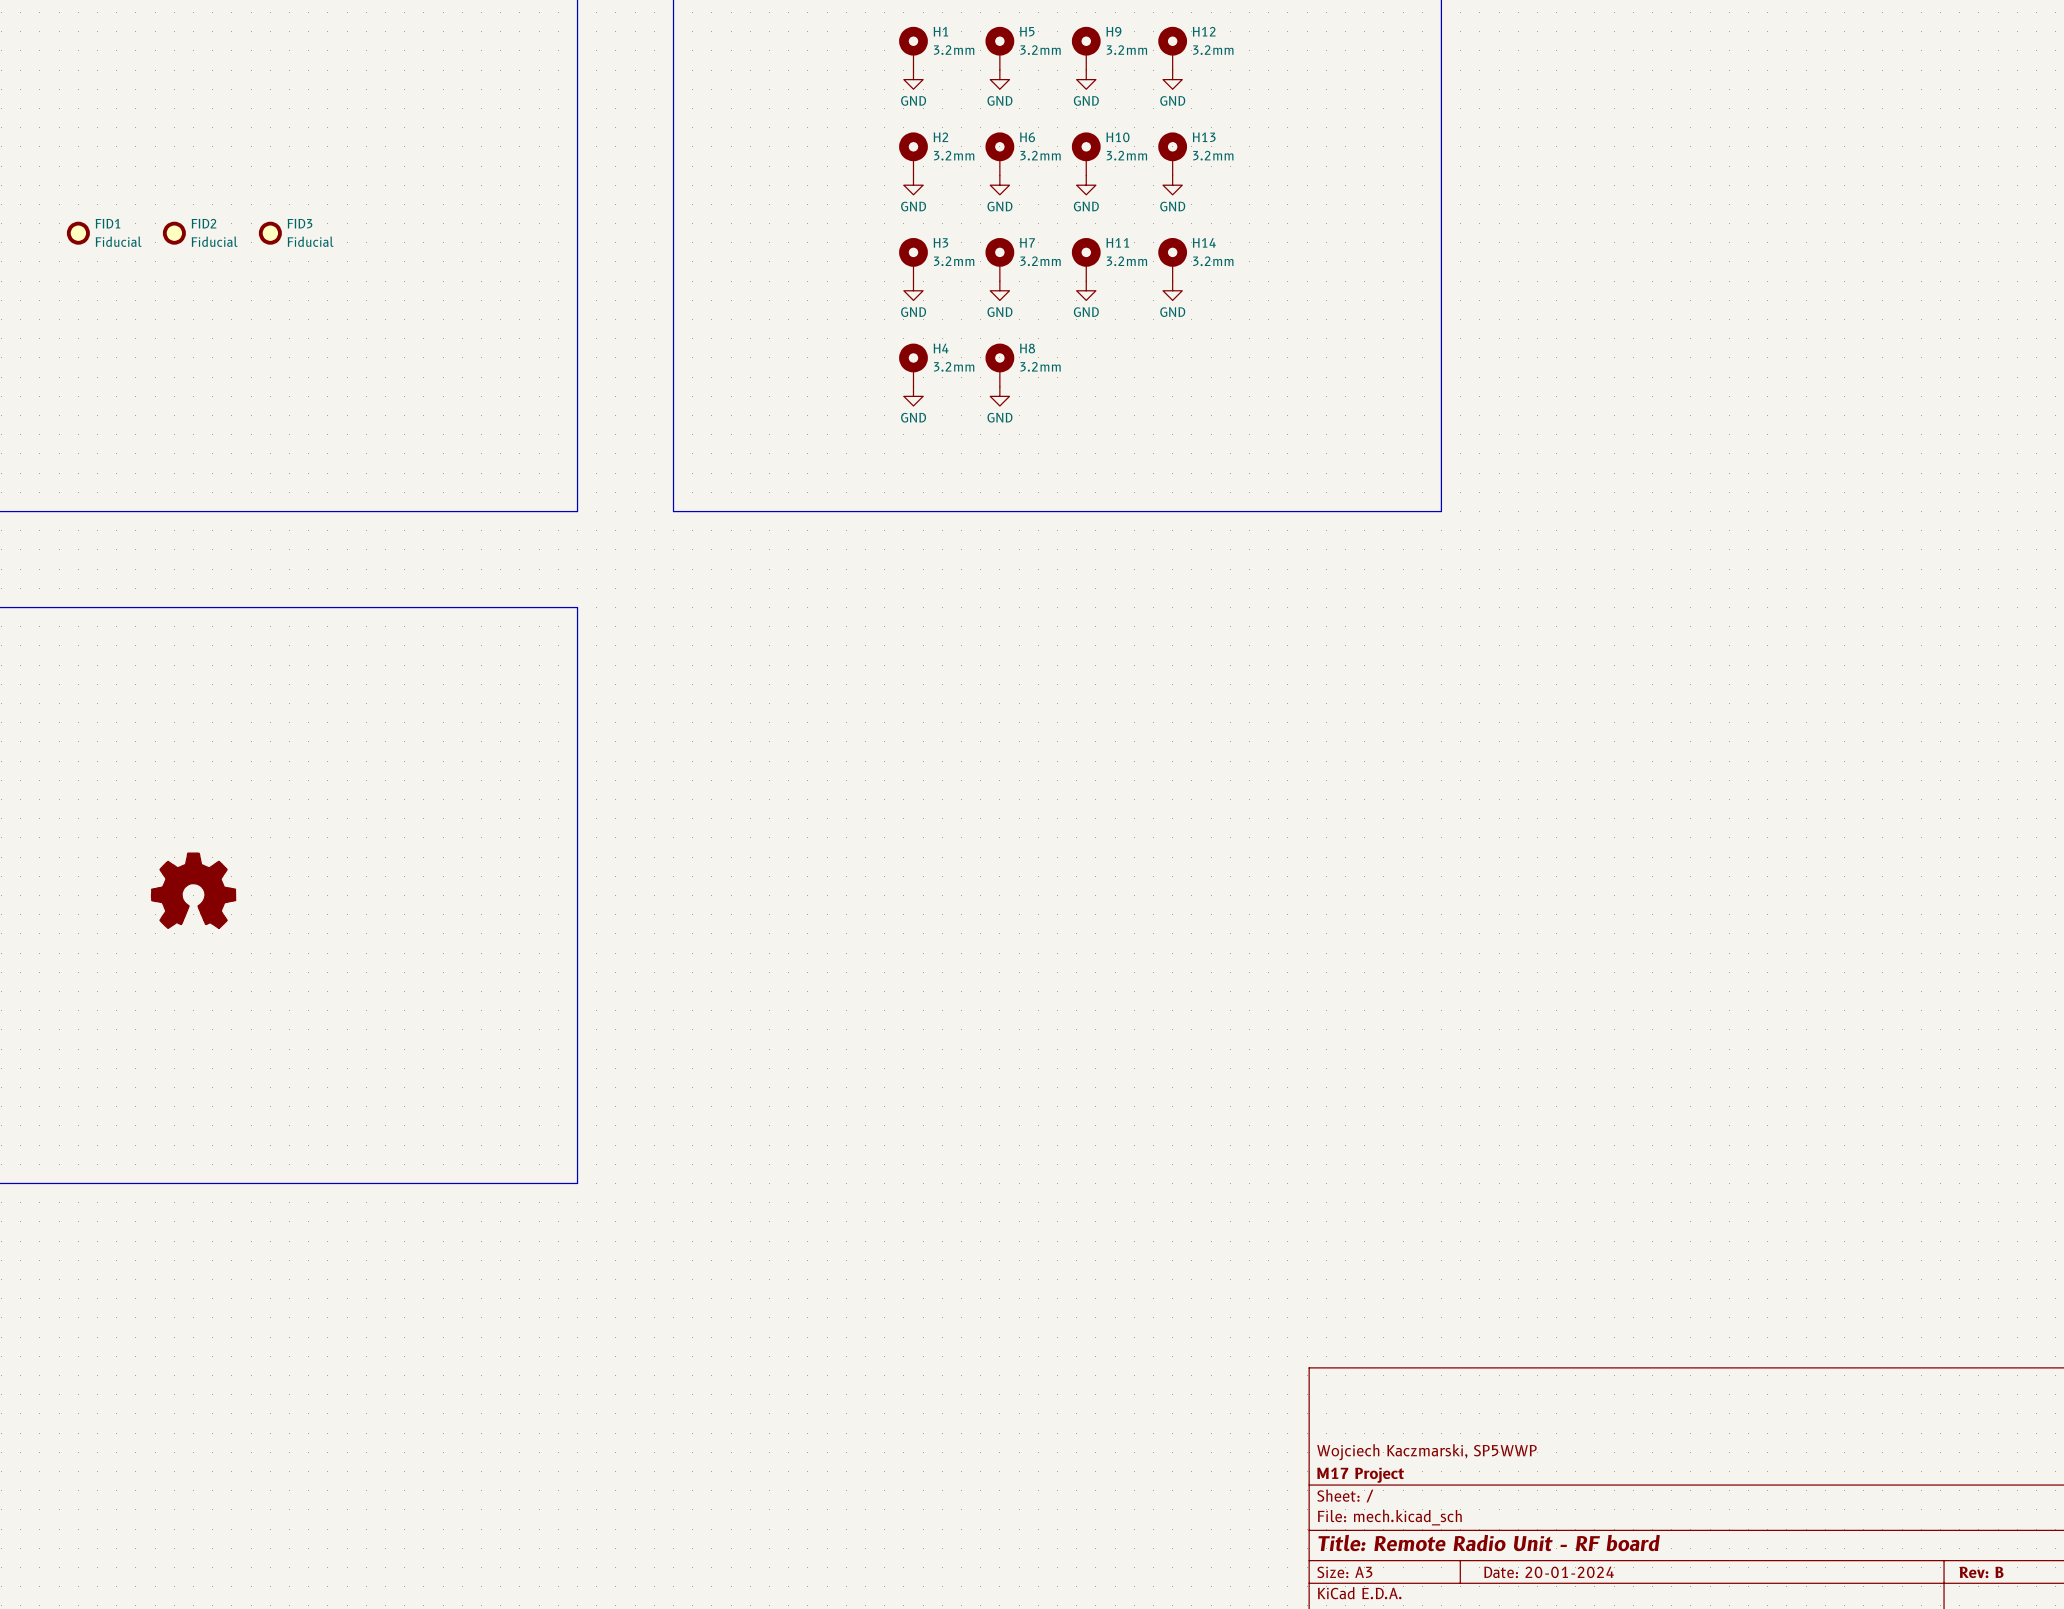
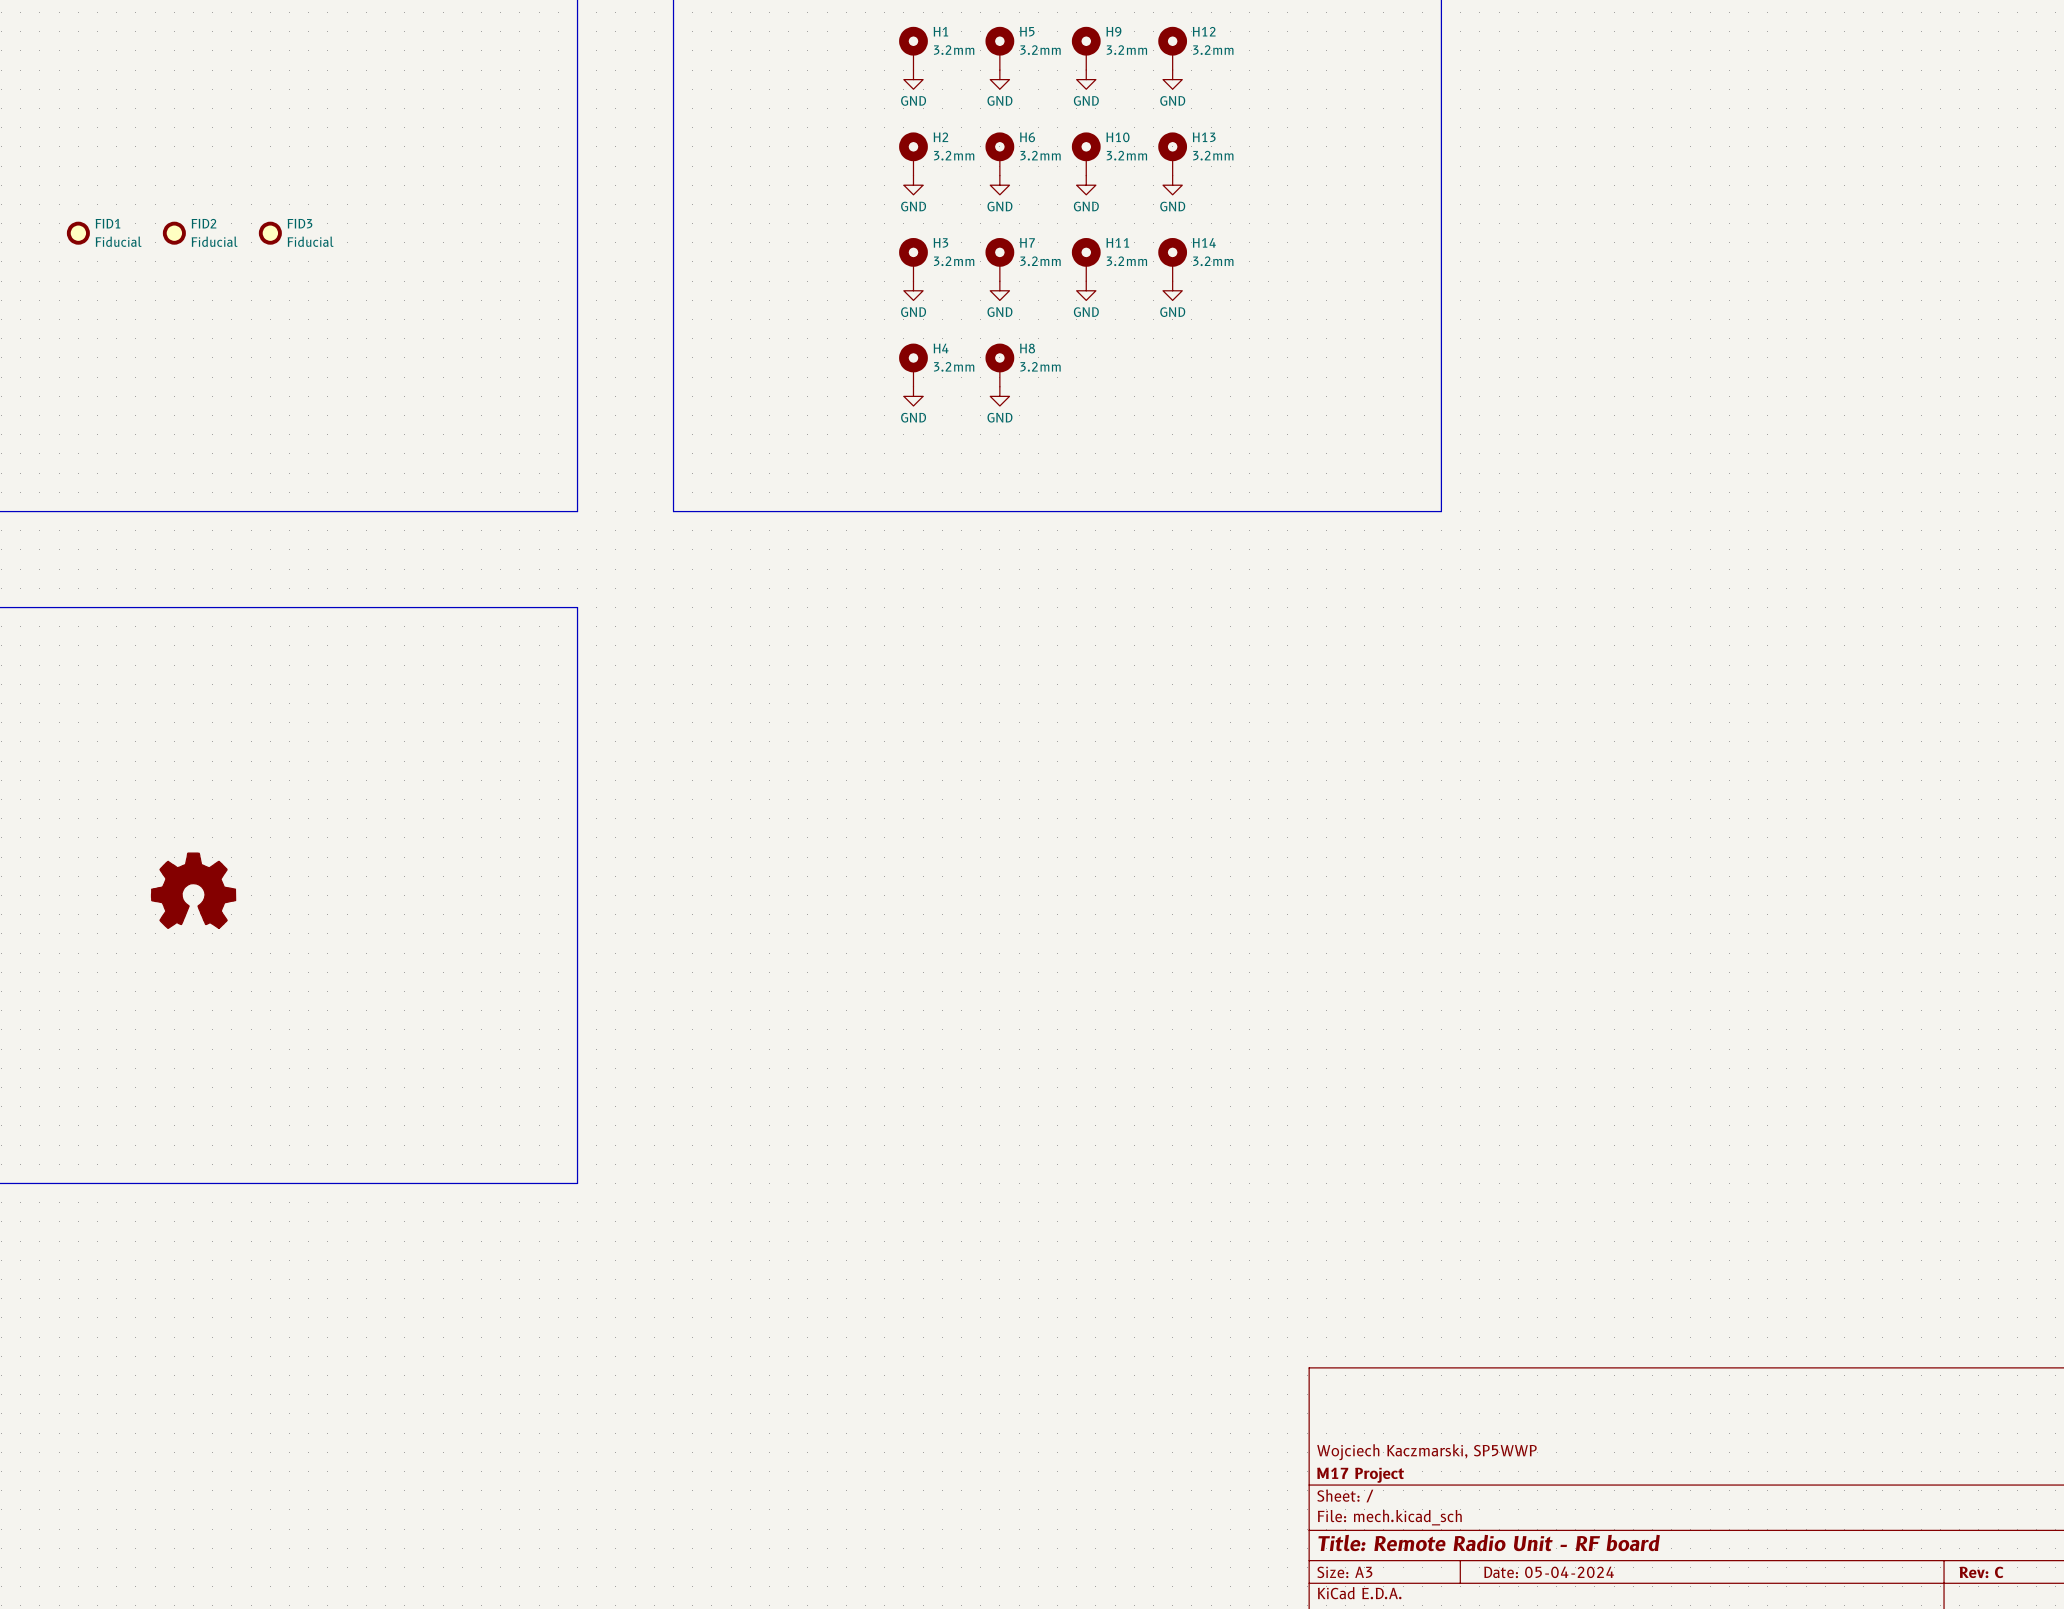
title block: Date: 20-01-2024 (1549, 1572) -> Date: 05-04-2024 (1549, 1572)
title block: Rev: B (1981, 1572) -> Rev: C (1981, 1572)

